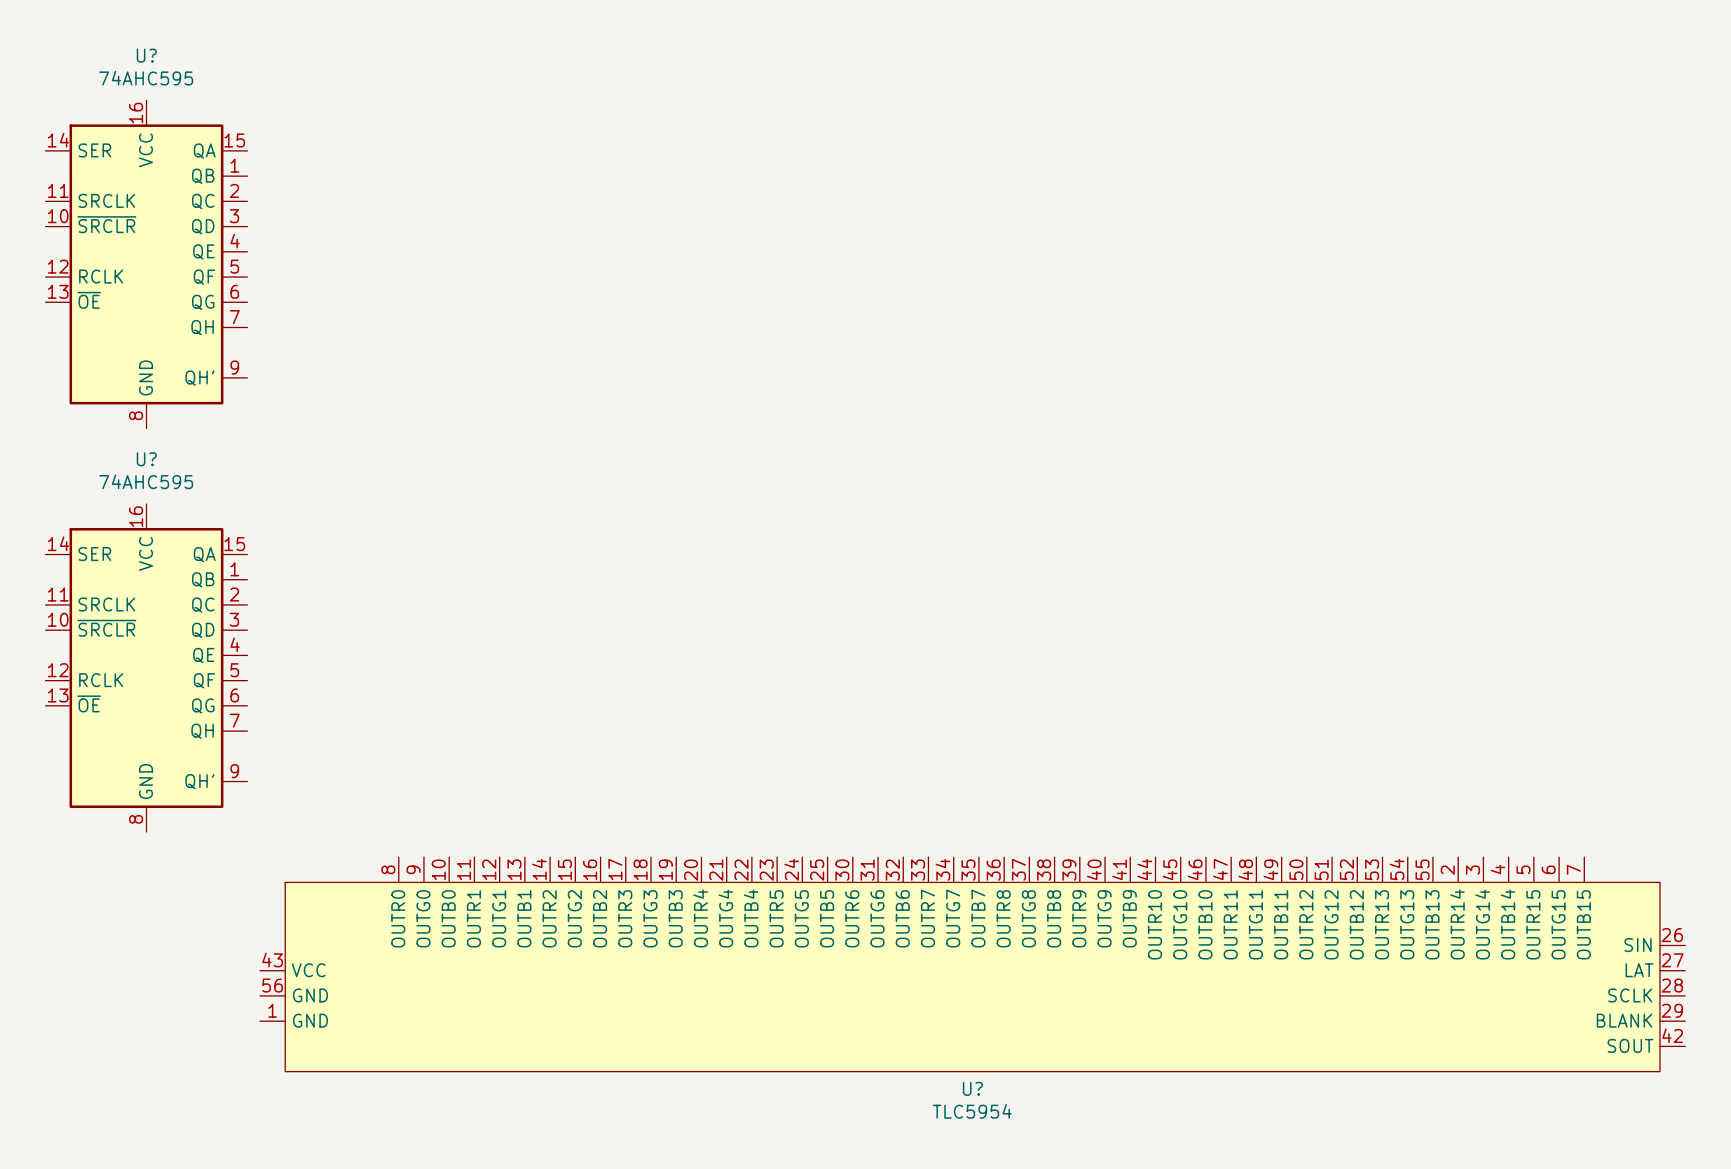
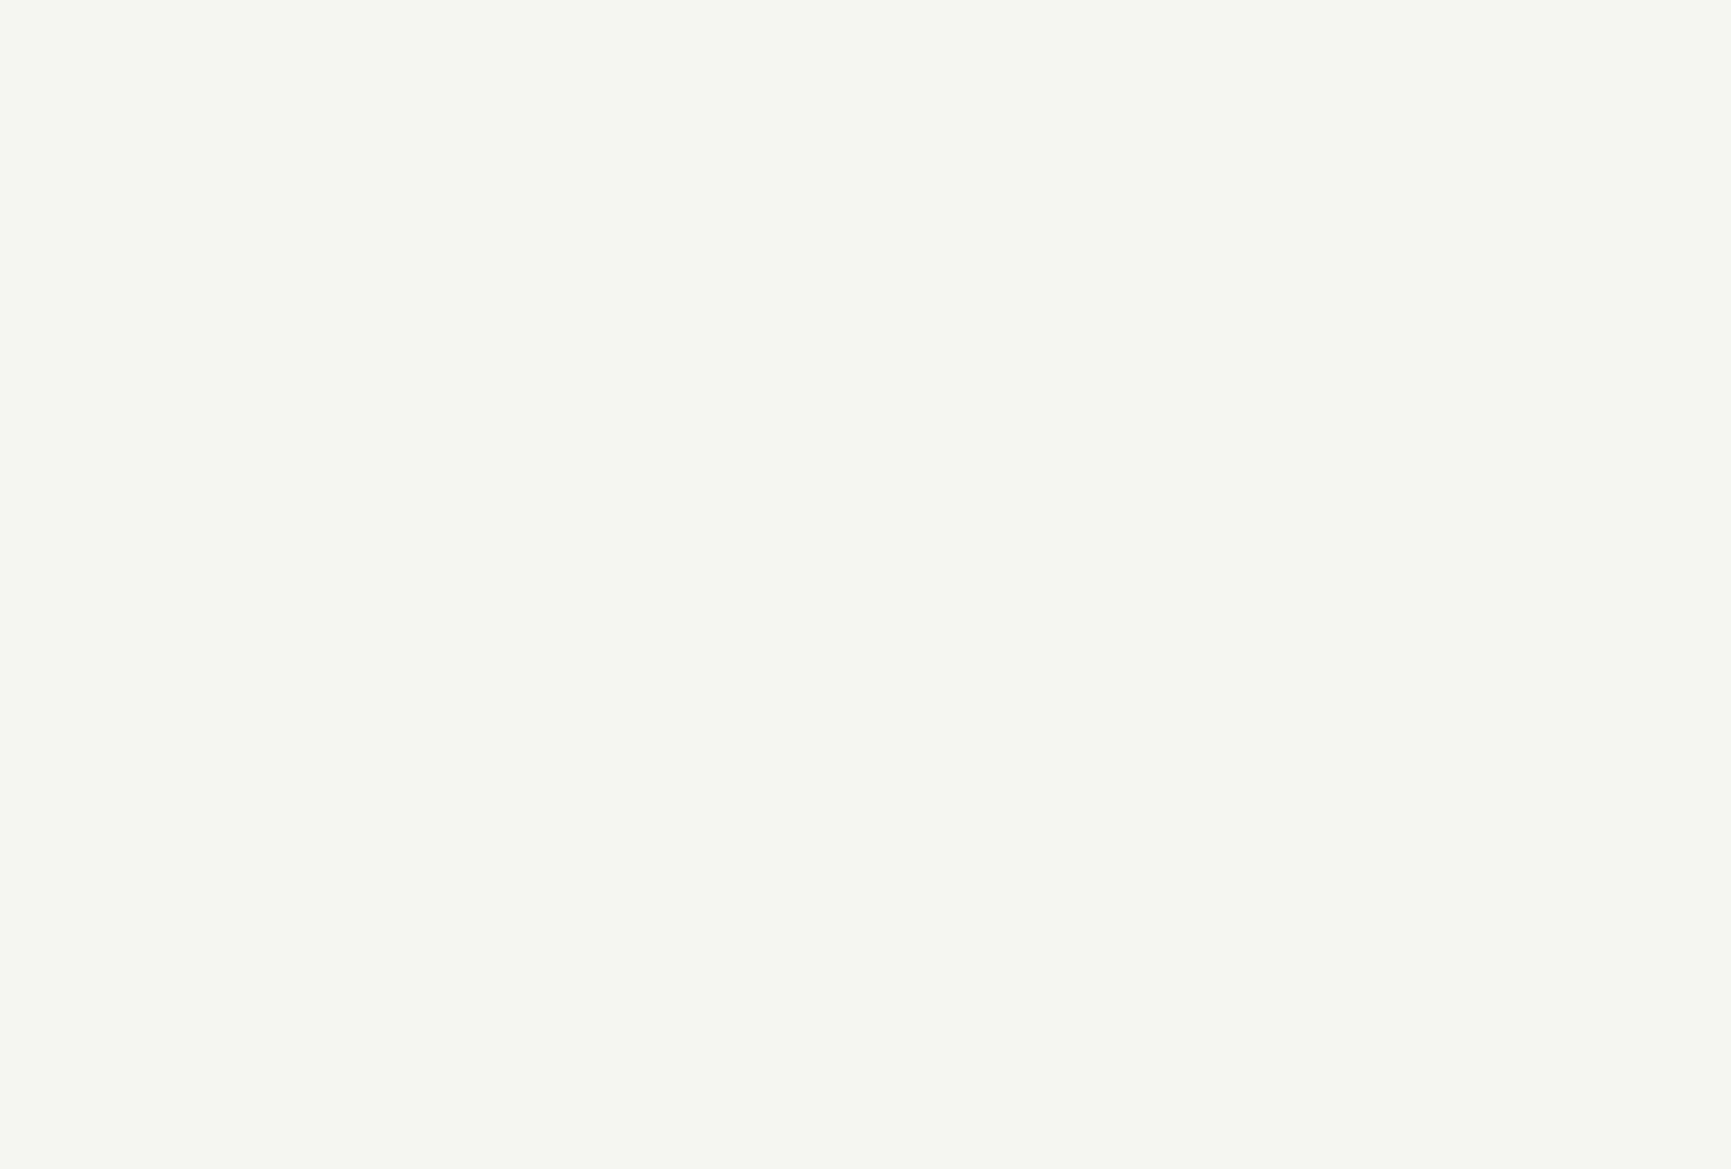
U?: 74AHC595 (146, 264) -> none
U?: 74AHC595 (146, 668) -> none
U?: TLC5954 (972, 964) -> none

